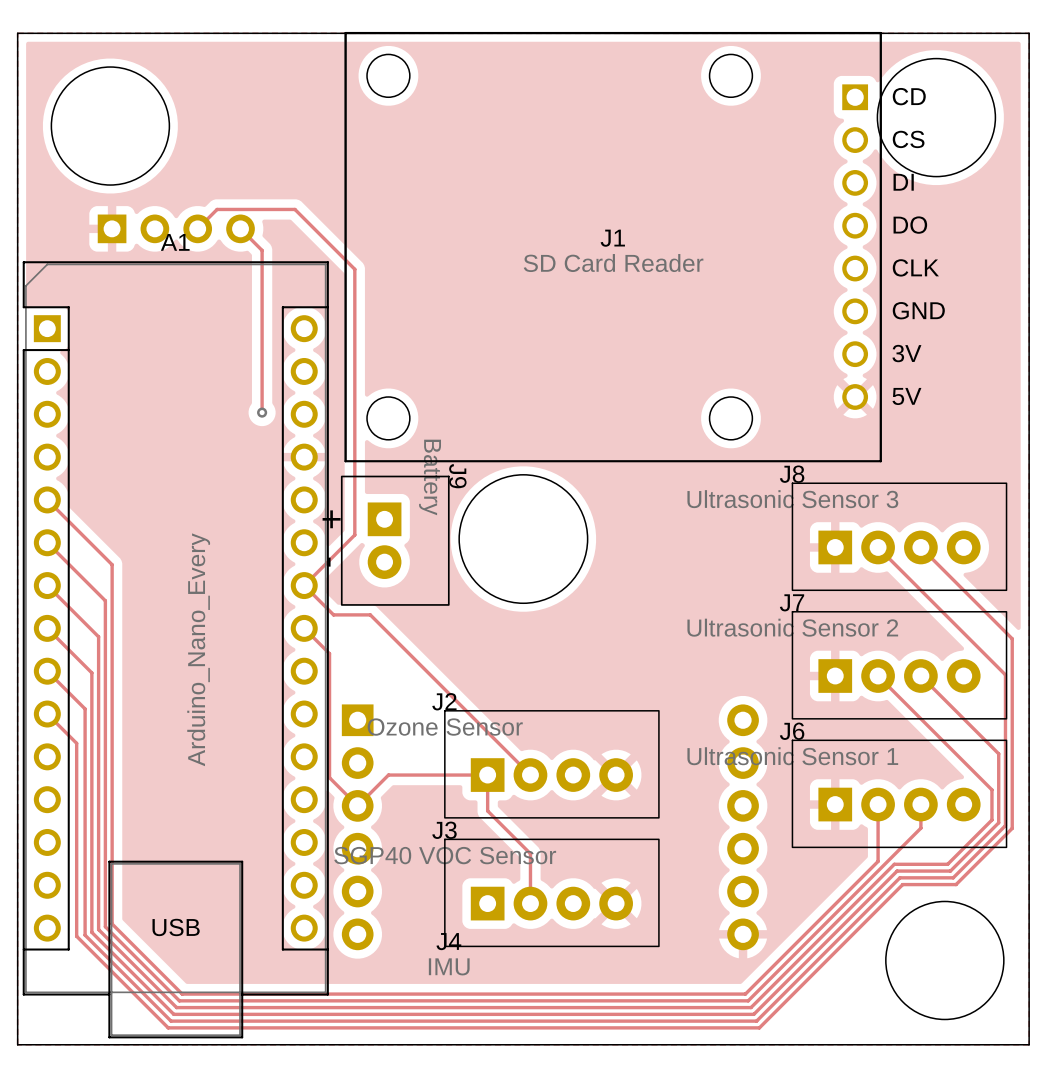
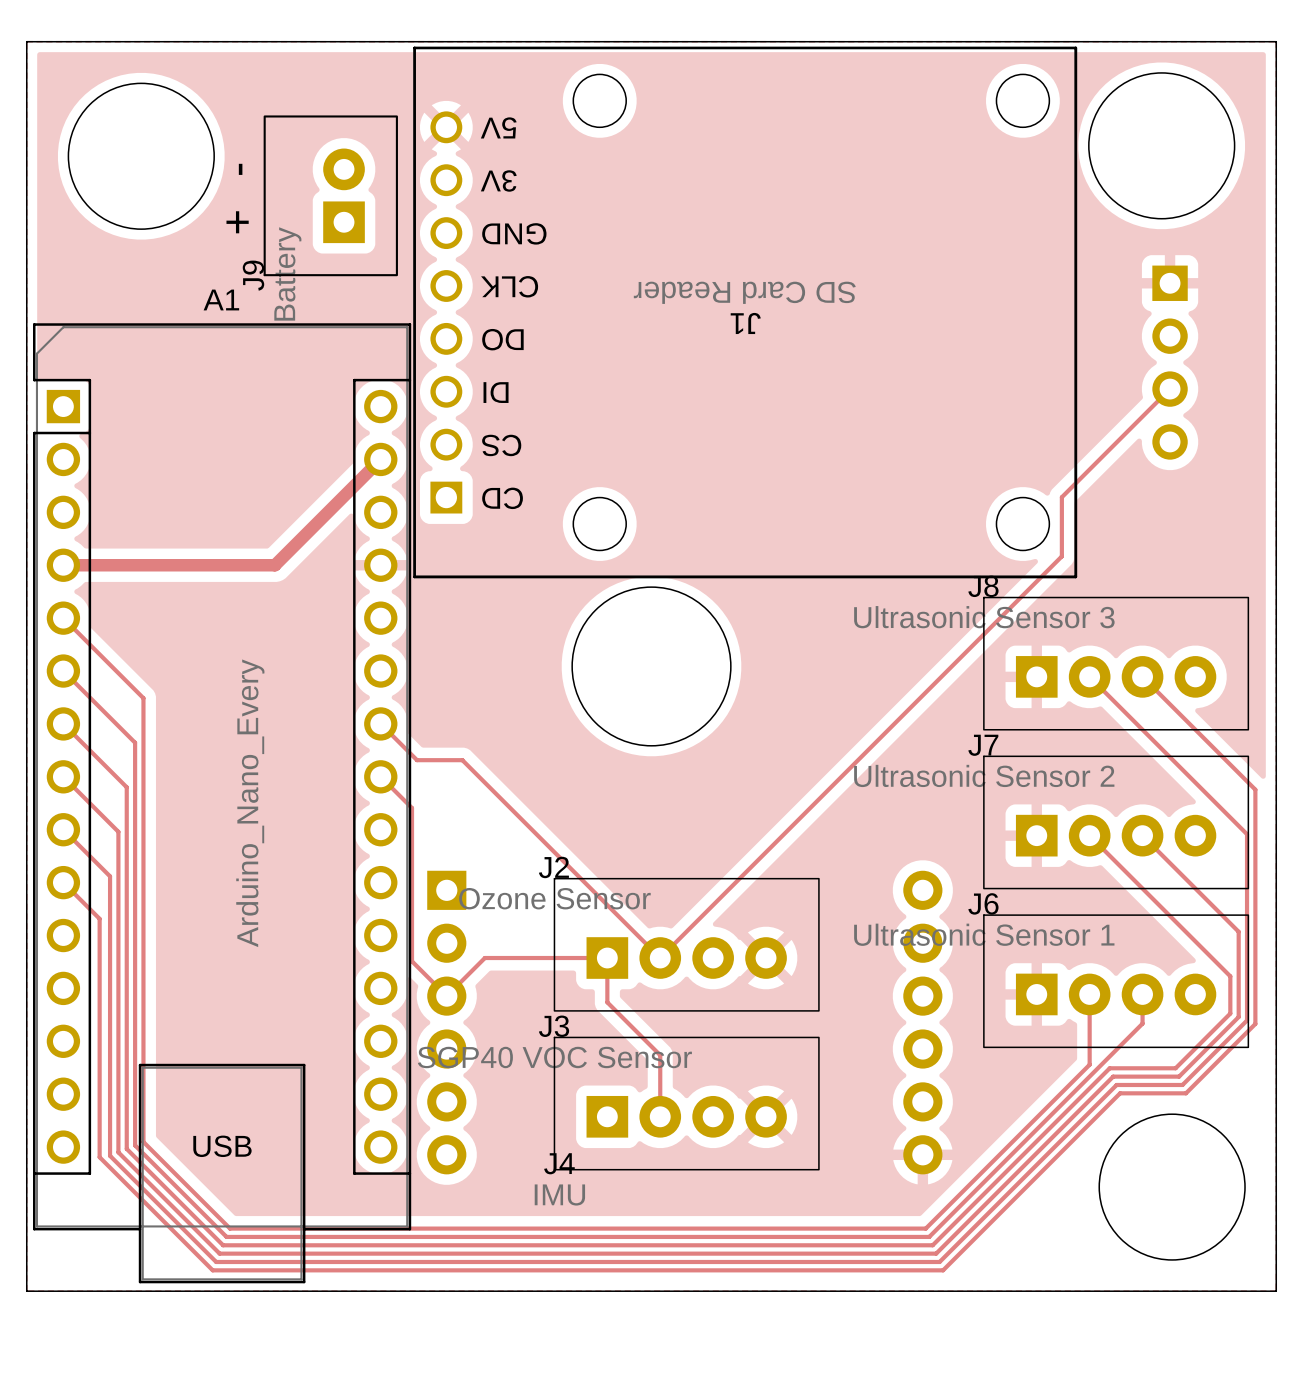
J1 footprint: [344, 31, 882, 463] -> [413, 46, 1078, 579]
part: (176, 228) -> none
track: (197, 228) (217, 209) (294, 209) (354, 269) (354, 534) (304, 585) -> none
track: (240, 228) (262, 250) (262, 412) -> none
J1 value position: SD Card Reader (613, 263) -> SD Card Reader (744, 292)
part: none -> (1170, 362)
track: none -> (1170, 389) (1061, 497) (1061, 556) (660, 958)
track: none -> (380, 459) (274, 565) (63, 565)
via: (262, 412) -> none
J9 footprint: [340, 475, 450, 606] -> [263, 115, 398, 277]
J9 name position: J9 (457, 476) -> J9 (253, 275)
J9 value position: Battery (430, 477) -> Battery (287, 273)

